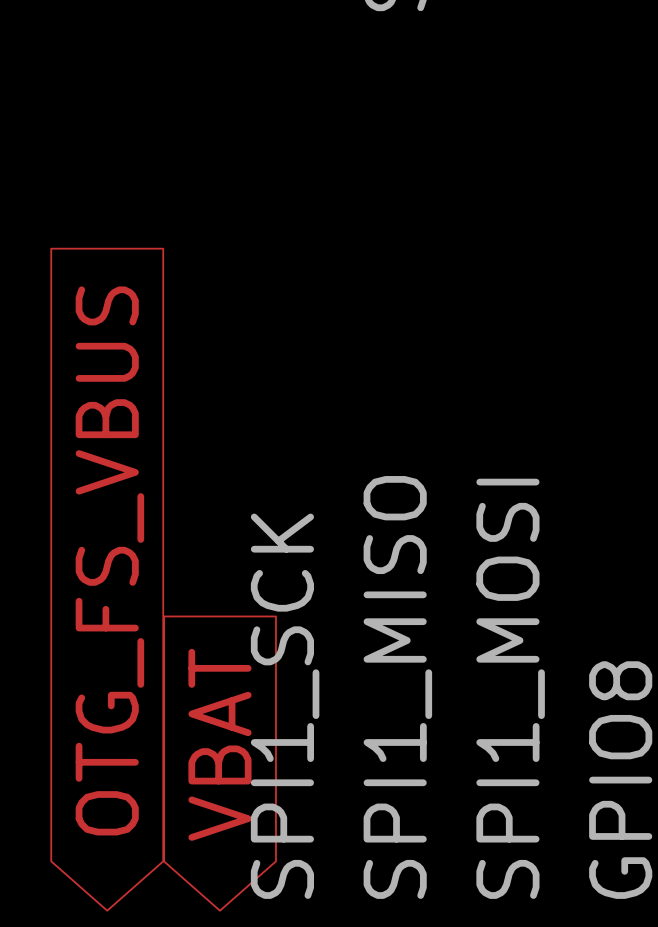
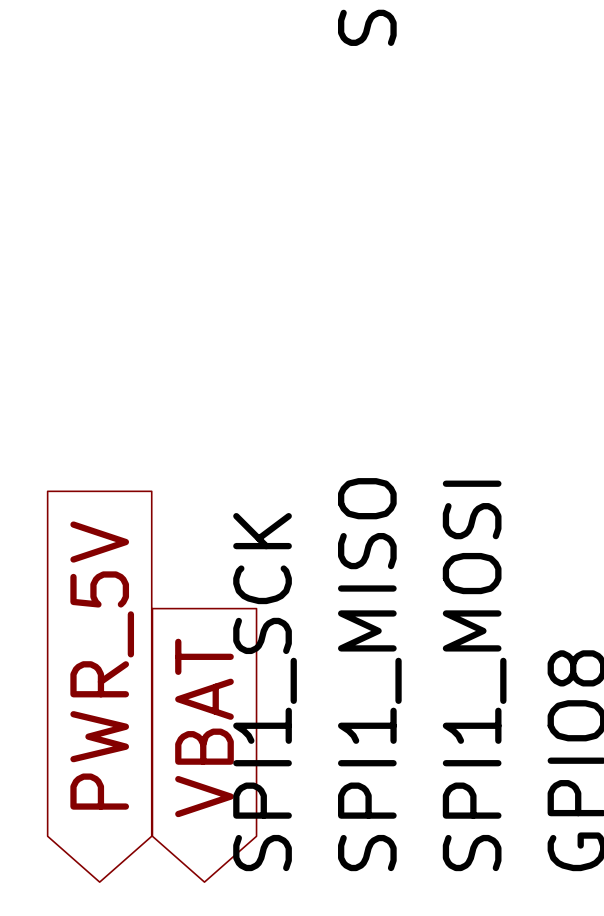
global label: OTG_FS_VBUS (109, 560) -> PWR_5V (102, 665)

